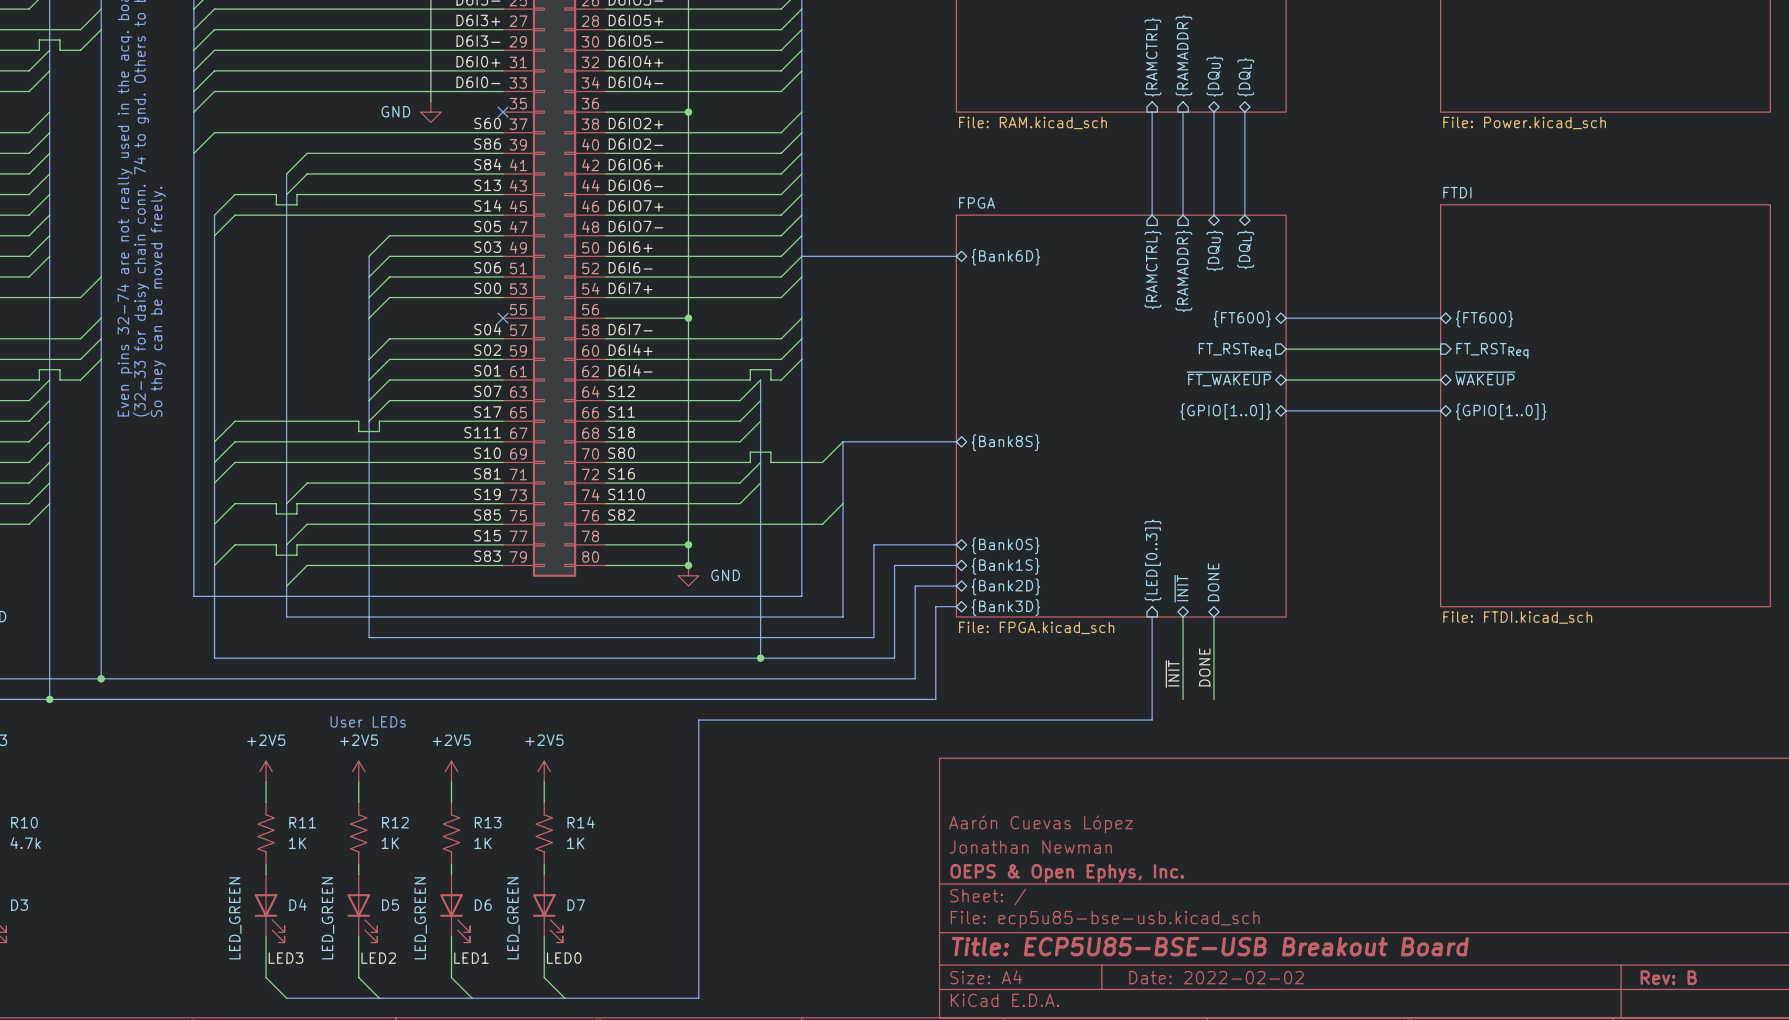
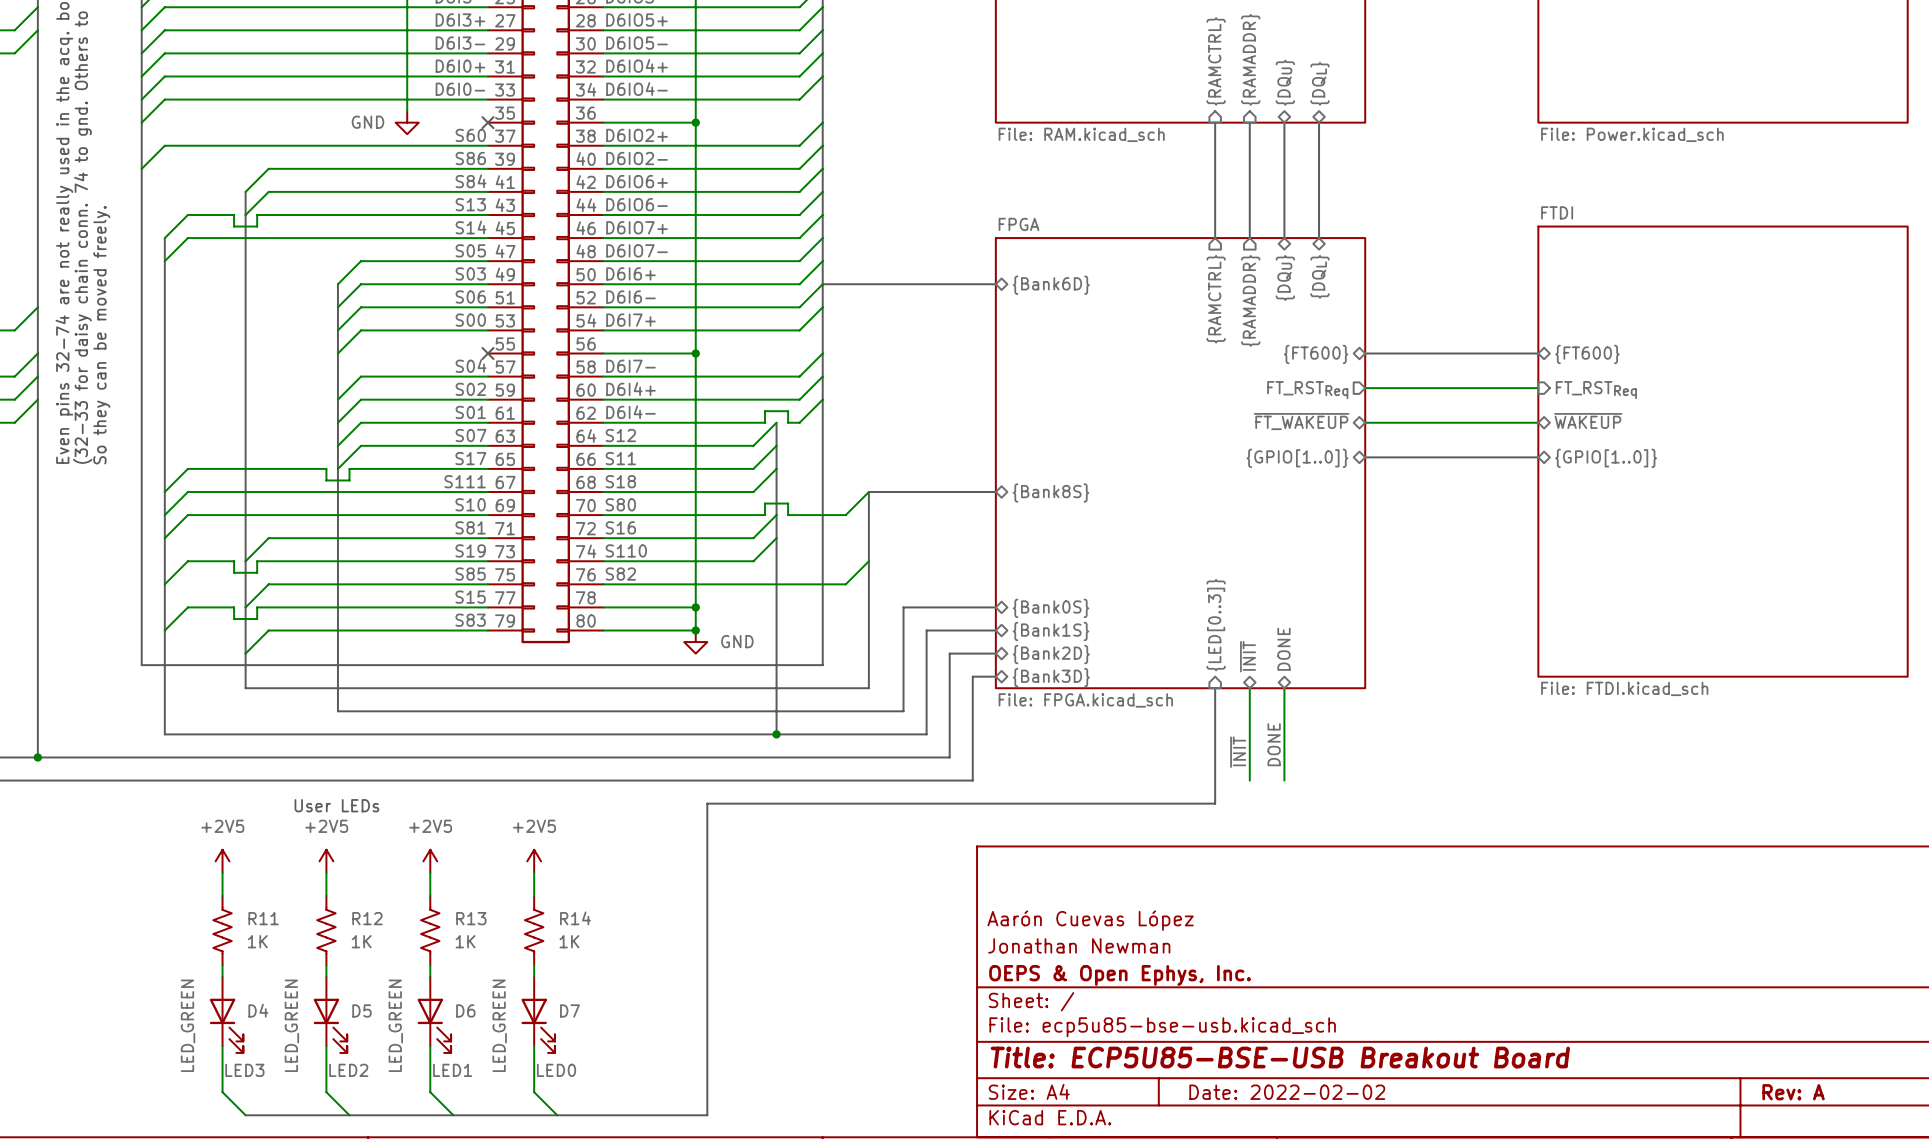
title block: Rev: B (1668, 977) -> Rev: A (1793, 1092)

